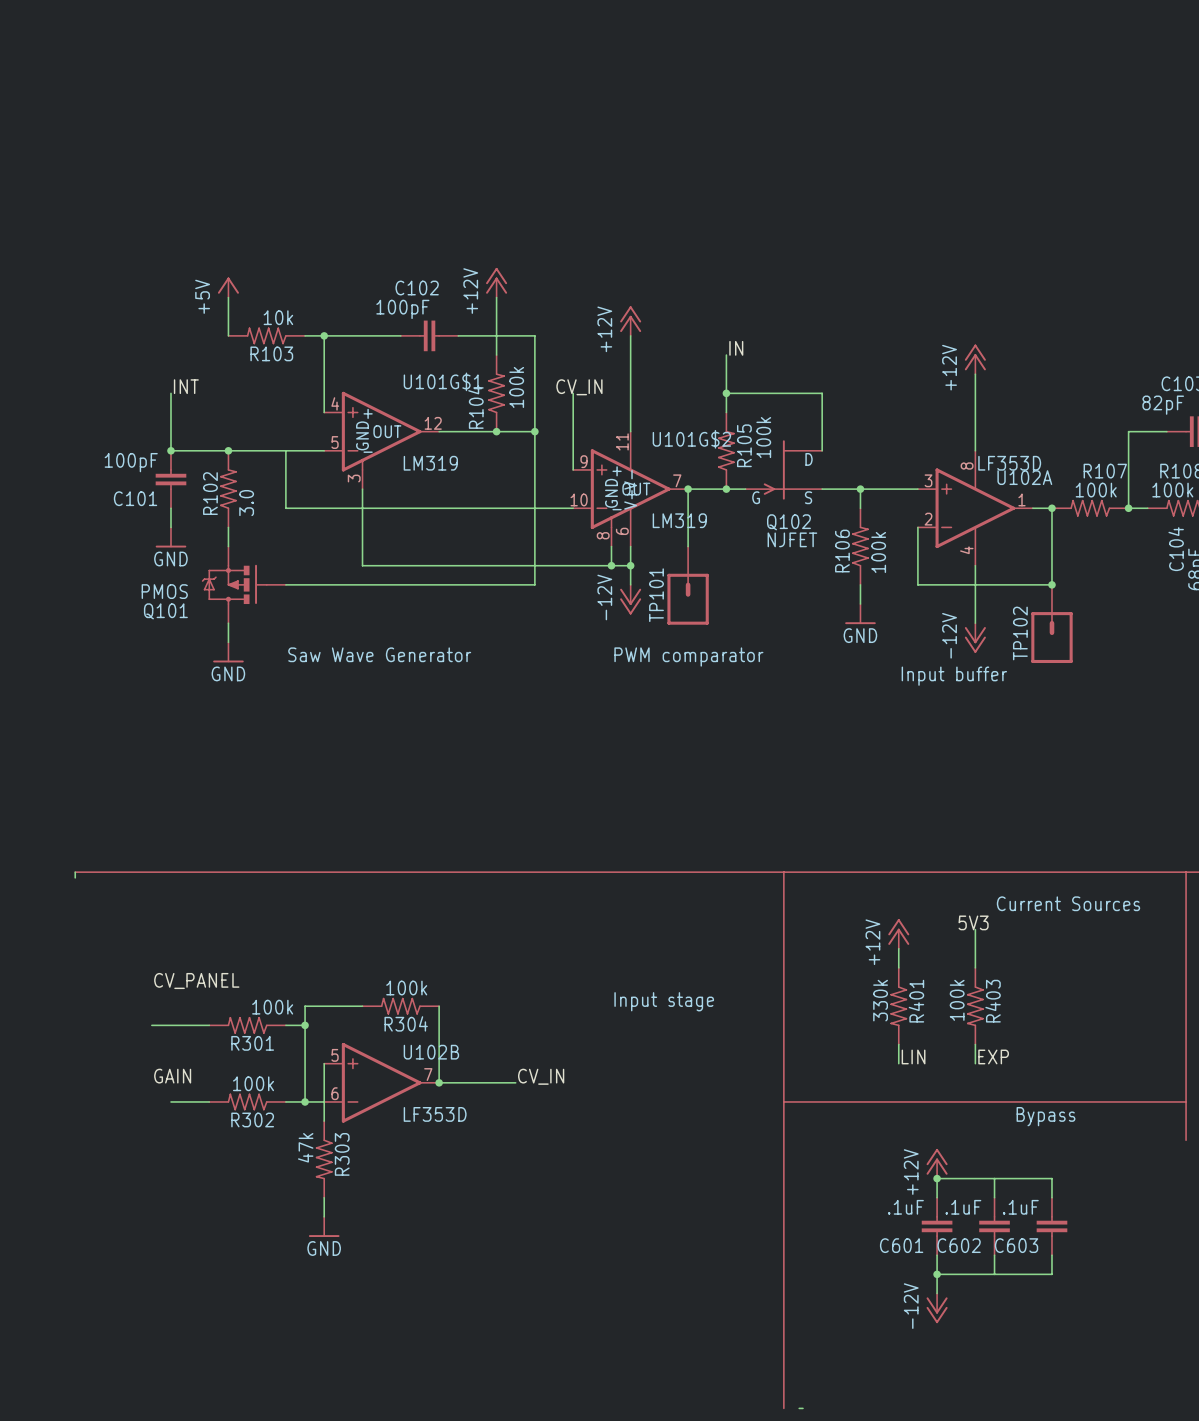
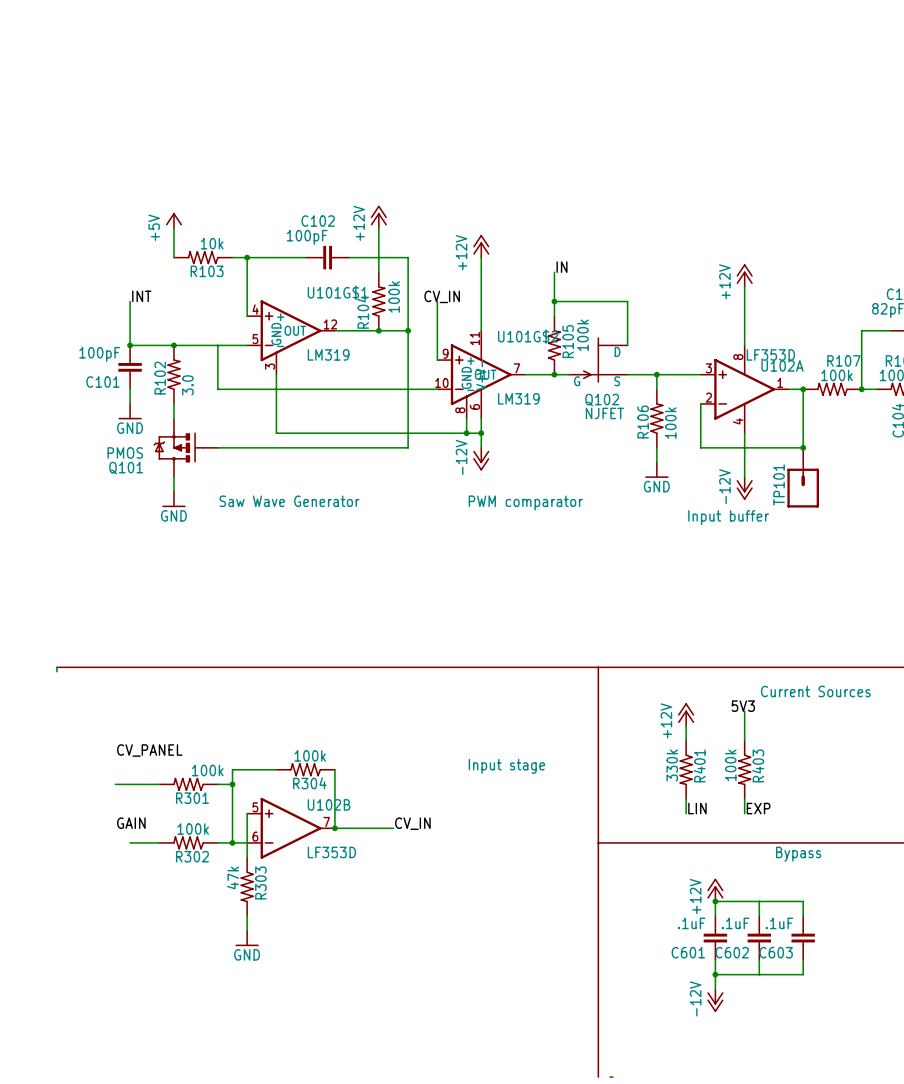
wire: (688, 489) (688, 546) -> none
junction: (688, 489) -> none
TP101: (688, 585) -> none
TP102 name: TP102 (1020, 633) -> TP101 (779, 484)

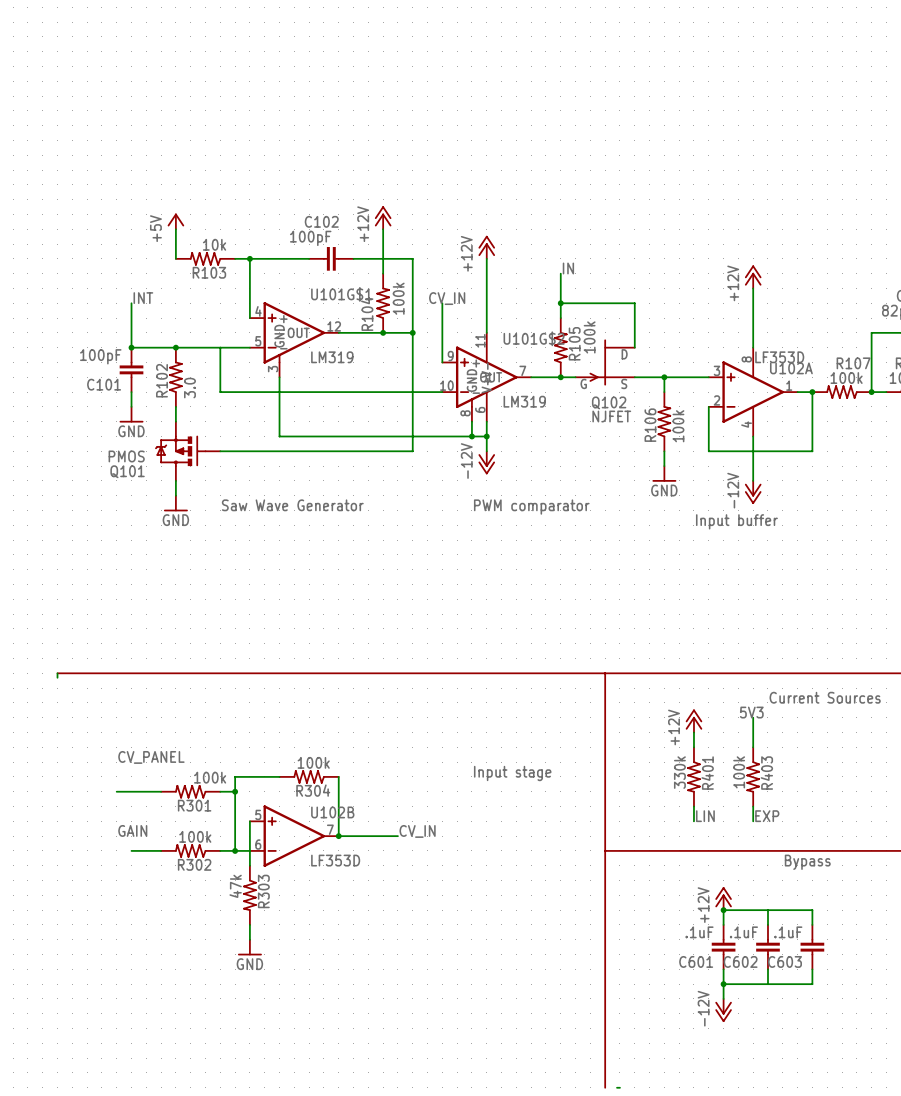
junction: (803, 447) -> none
TP101: (803, 477) -> none

